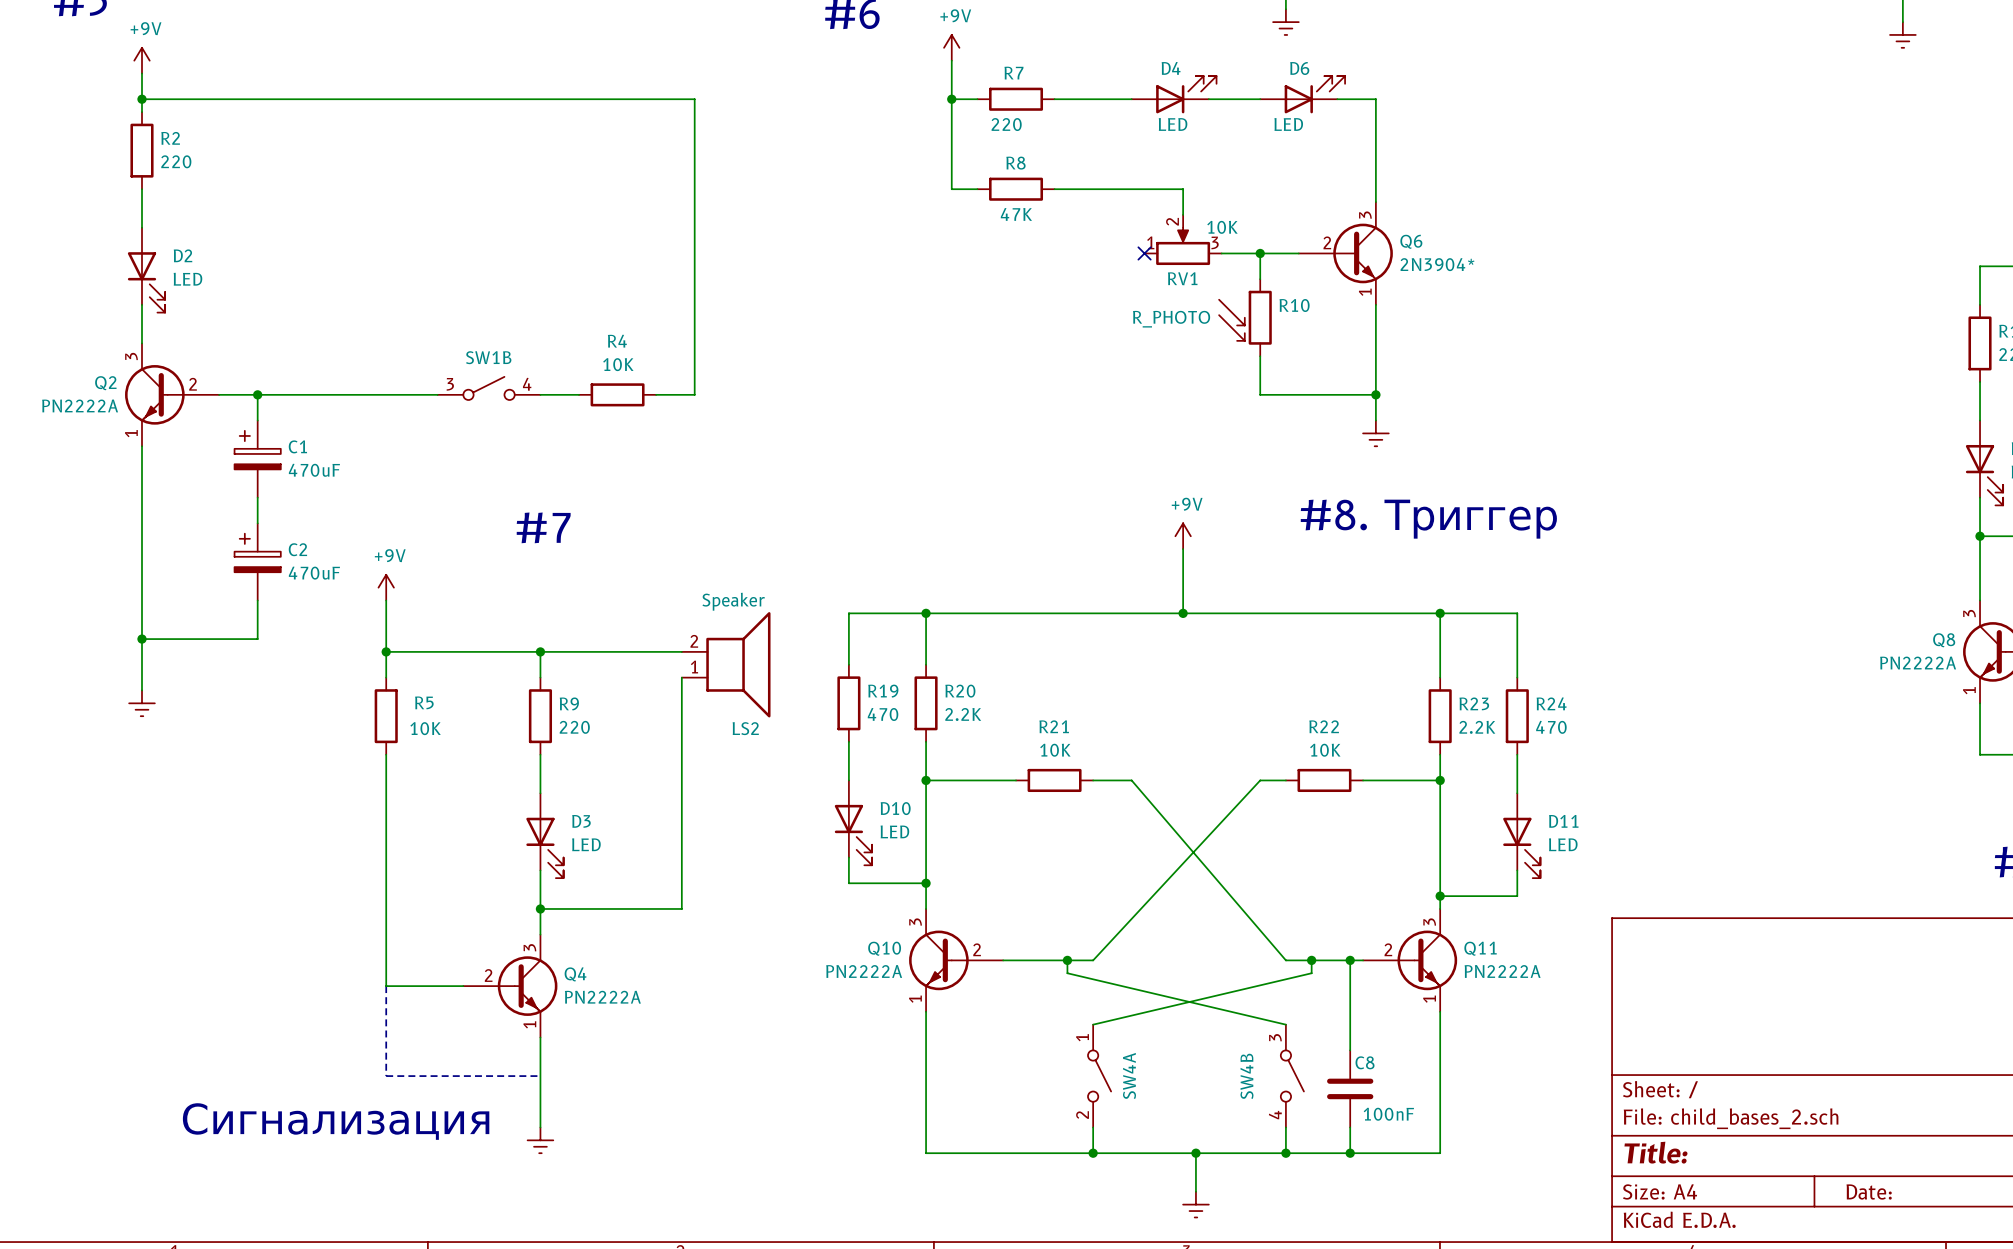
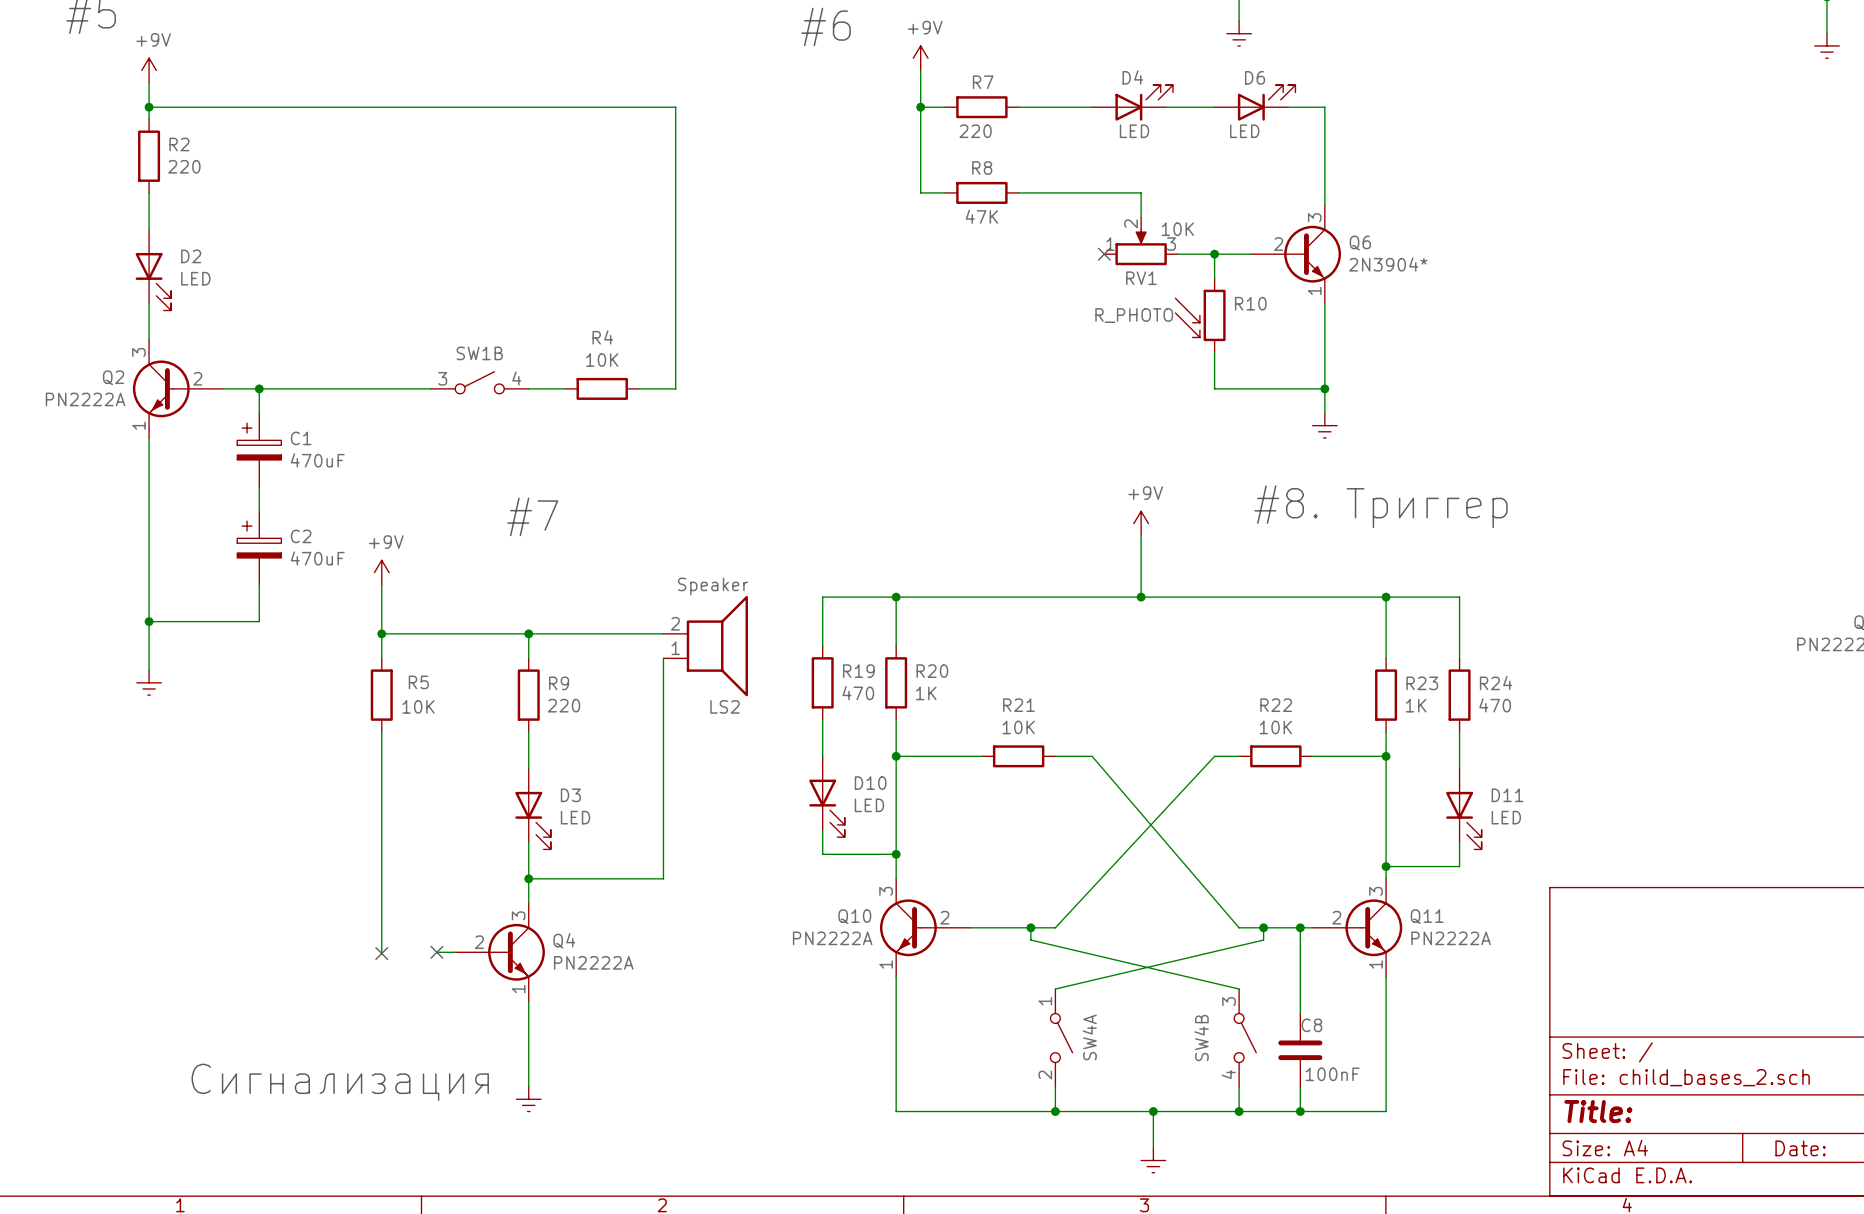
R20 value: 2.2K (963, 714) -> 1K (926, 693)
R23 value: 2.2K (1477, 727) -> 1K (1416, 705)
wire: (386, 986) (444, 986) -> none
line: (386, 986) (386, 1076) (540, 1076) -> none
no-connect mark: none -> (436, 952)
no-connect mark: none -> (381, 953)

